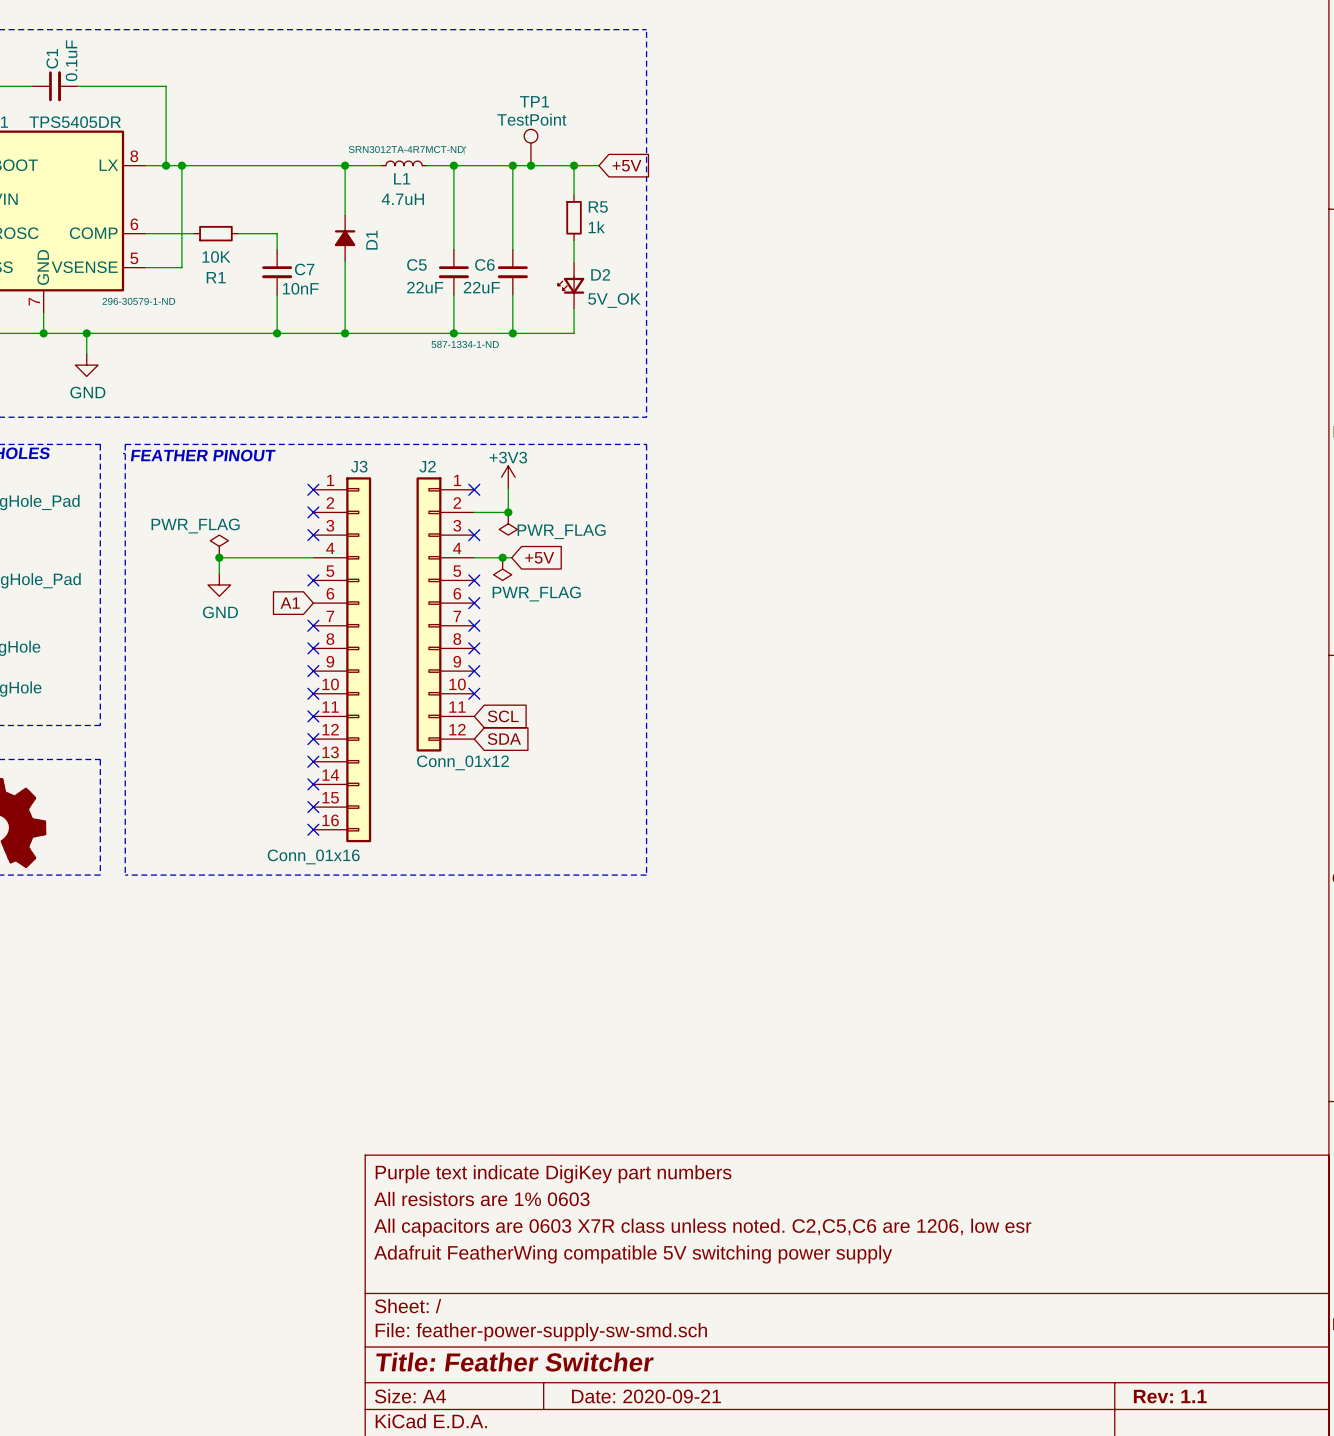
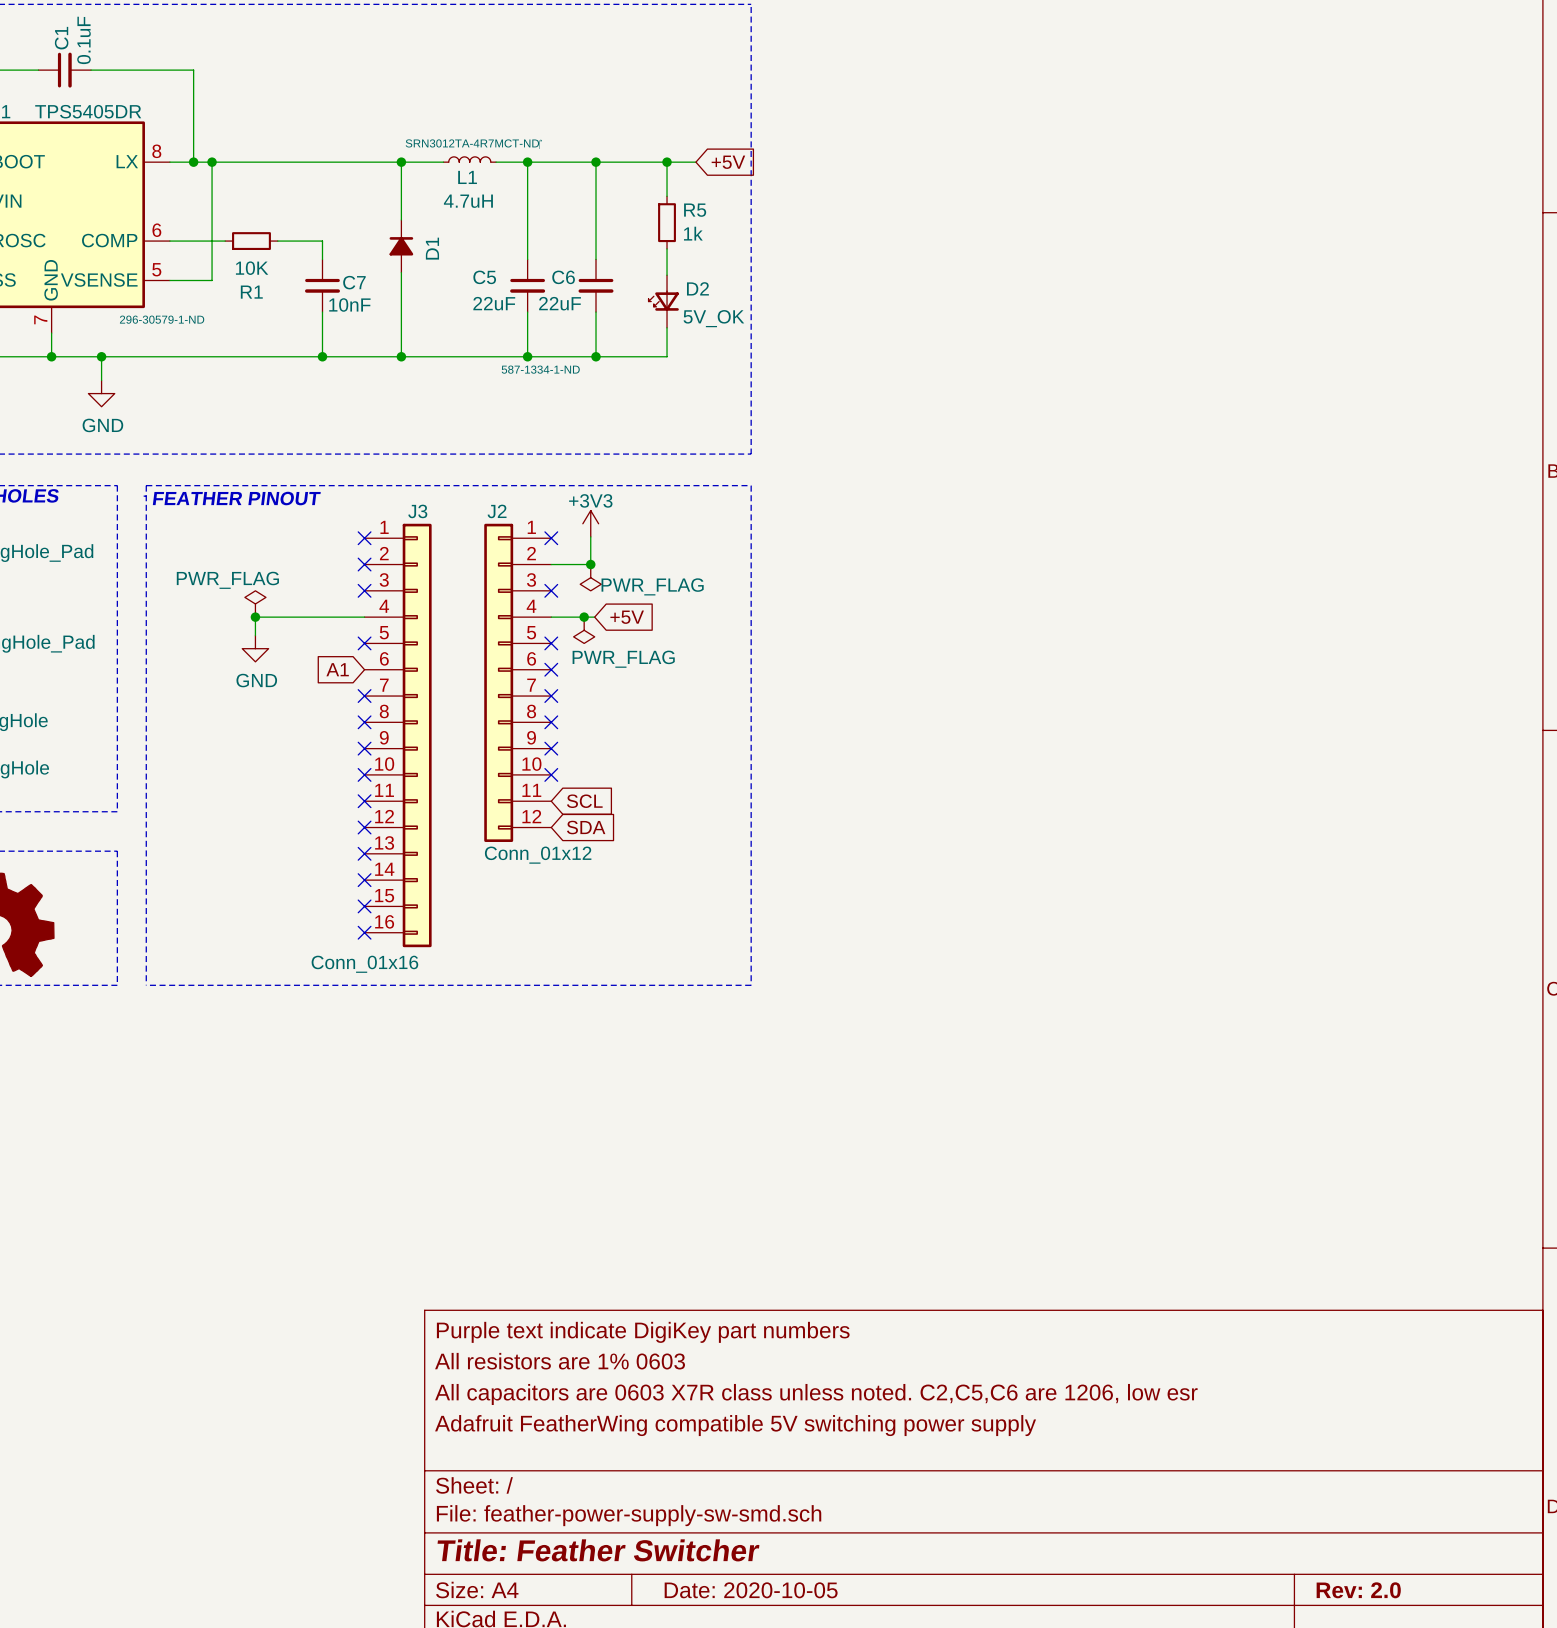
TP1: TestPoint (530, 147) -> none
junction: (530, 165) -> none
title block: Date: 2020-09-21 (646, 1396) -> Date: 2020-10-05 (751, 1590)
title block: Rev: 1.1 (1170, 1396) -> Rev: 2.0 (1358, 1590)

